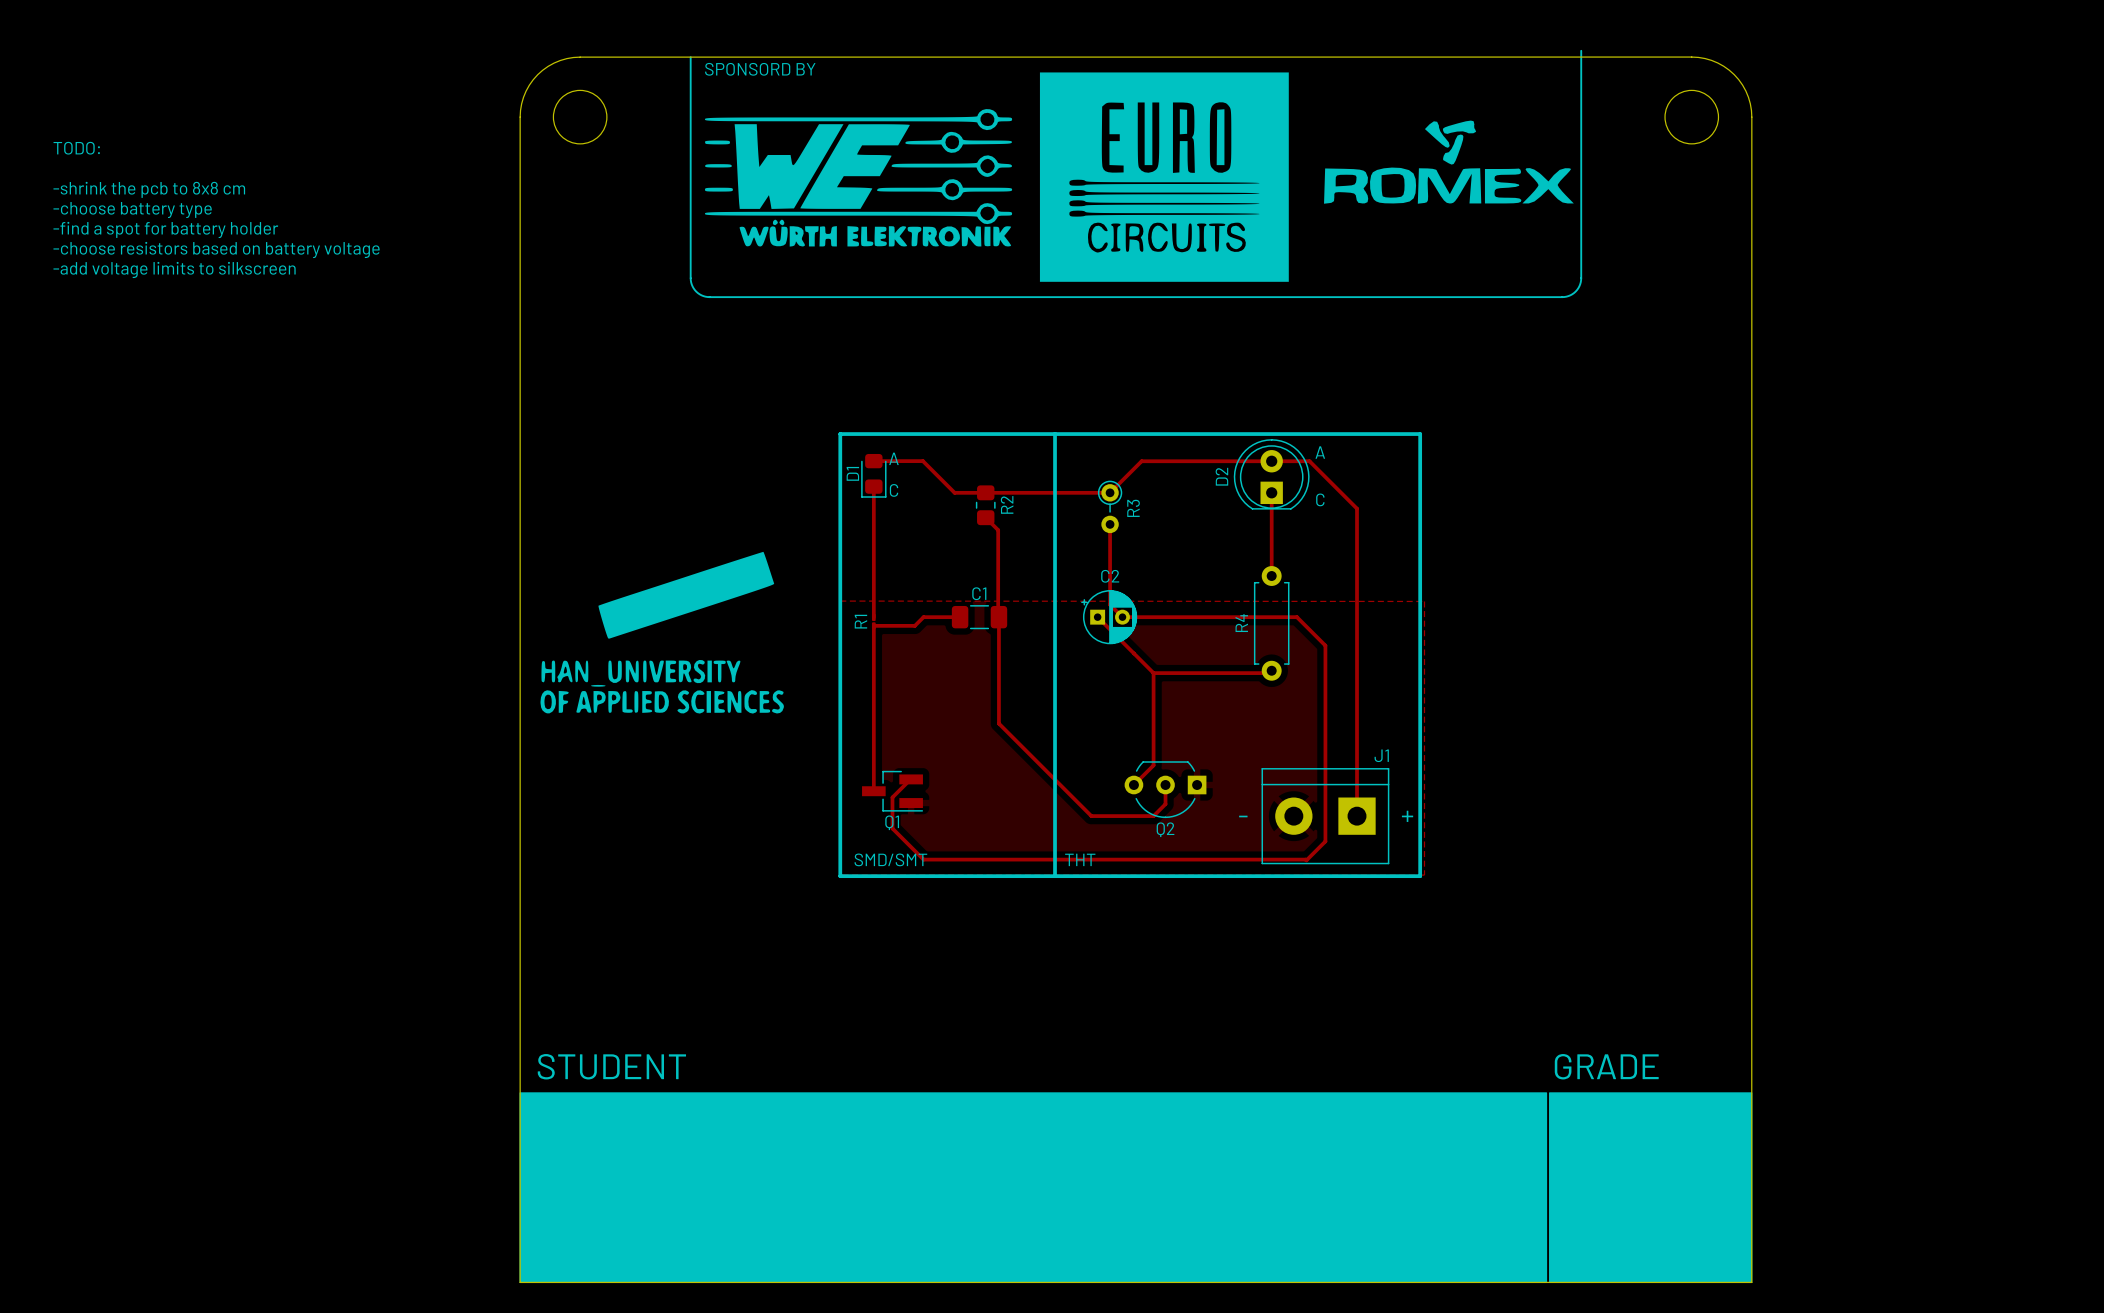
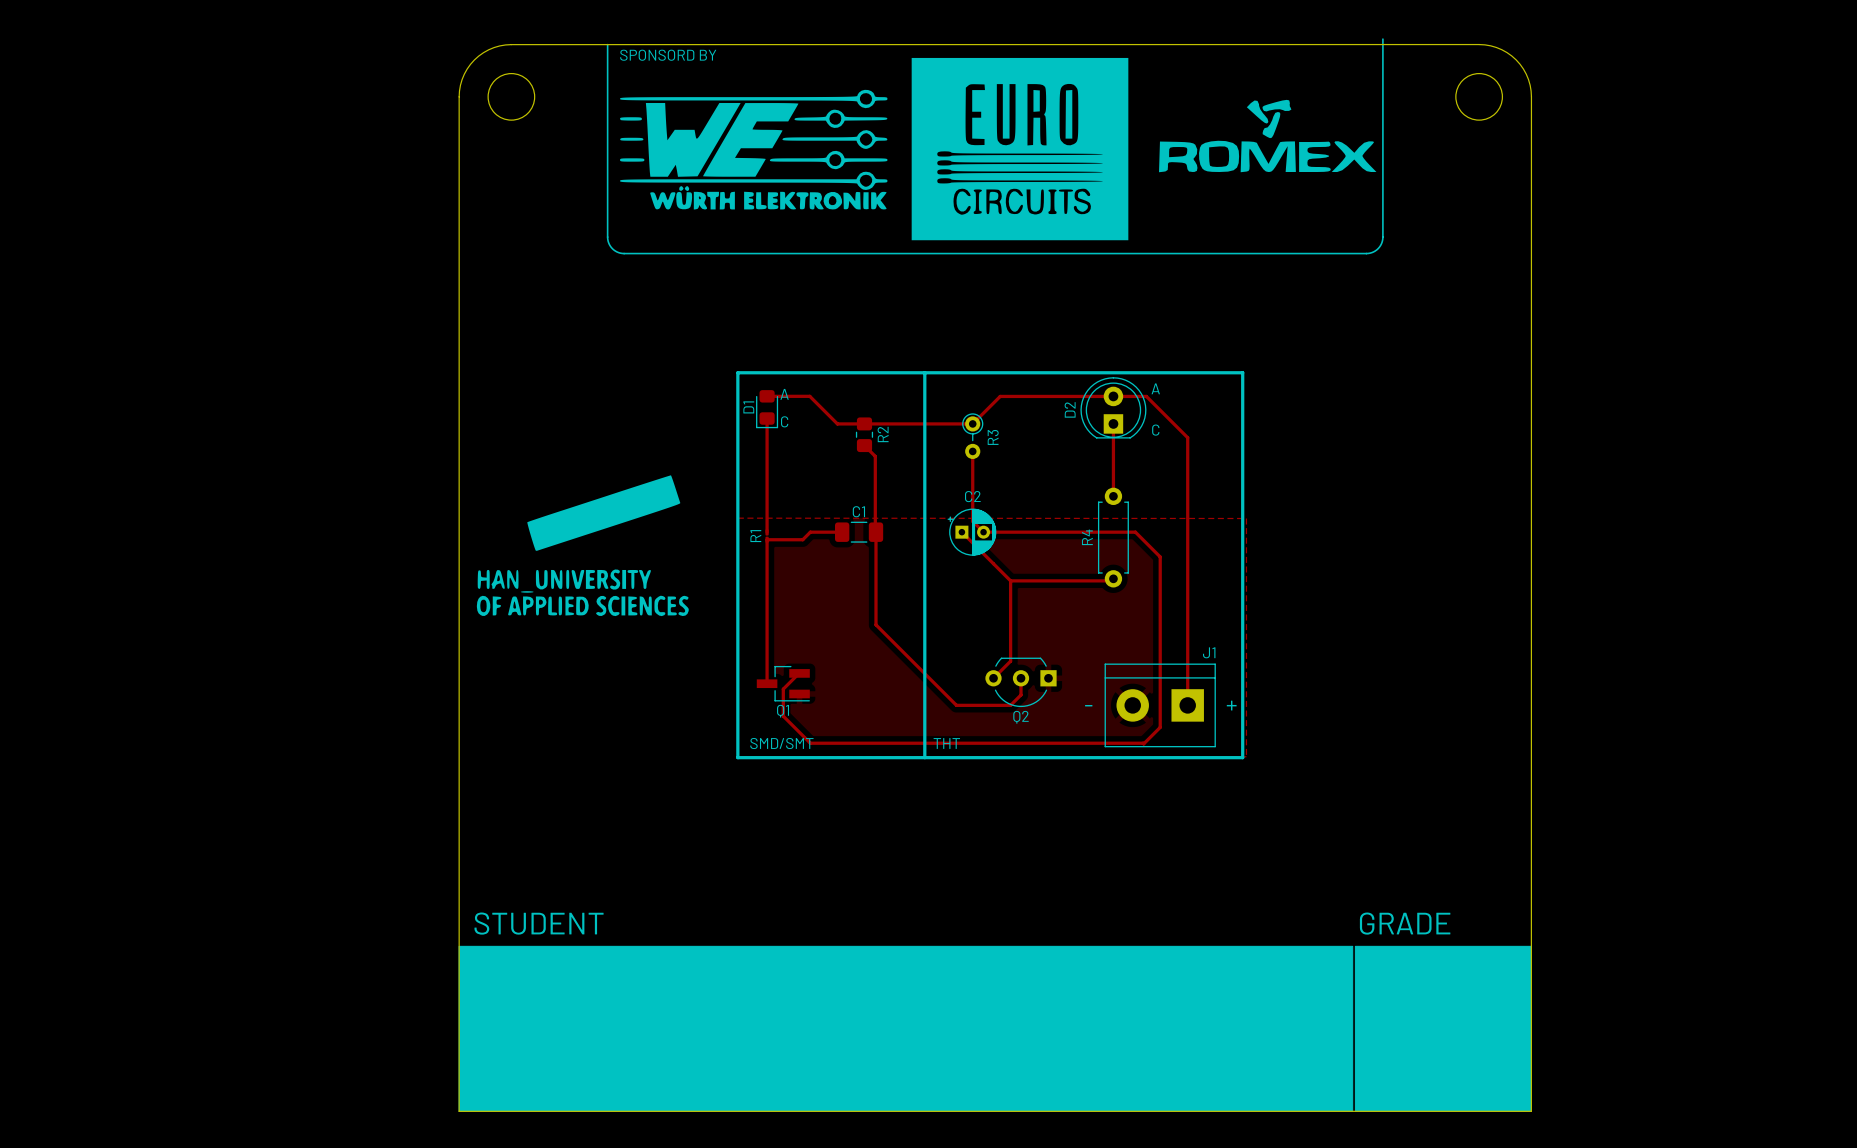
text: TODO: (76, 148) -> none
text: -shrink the pcb to 8x8 cm (149, 189) -> none
text: -choose battery type (132, 210) -> none
text: -find a spot for battery holder (165, 229) -> none
text: -choose resistors based on battery voltage (216, 249) -> none
text: -add voltage limits to silkscreen (174, 269) -> none

